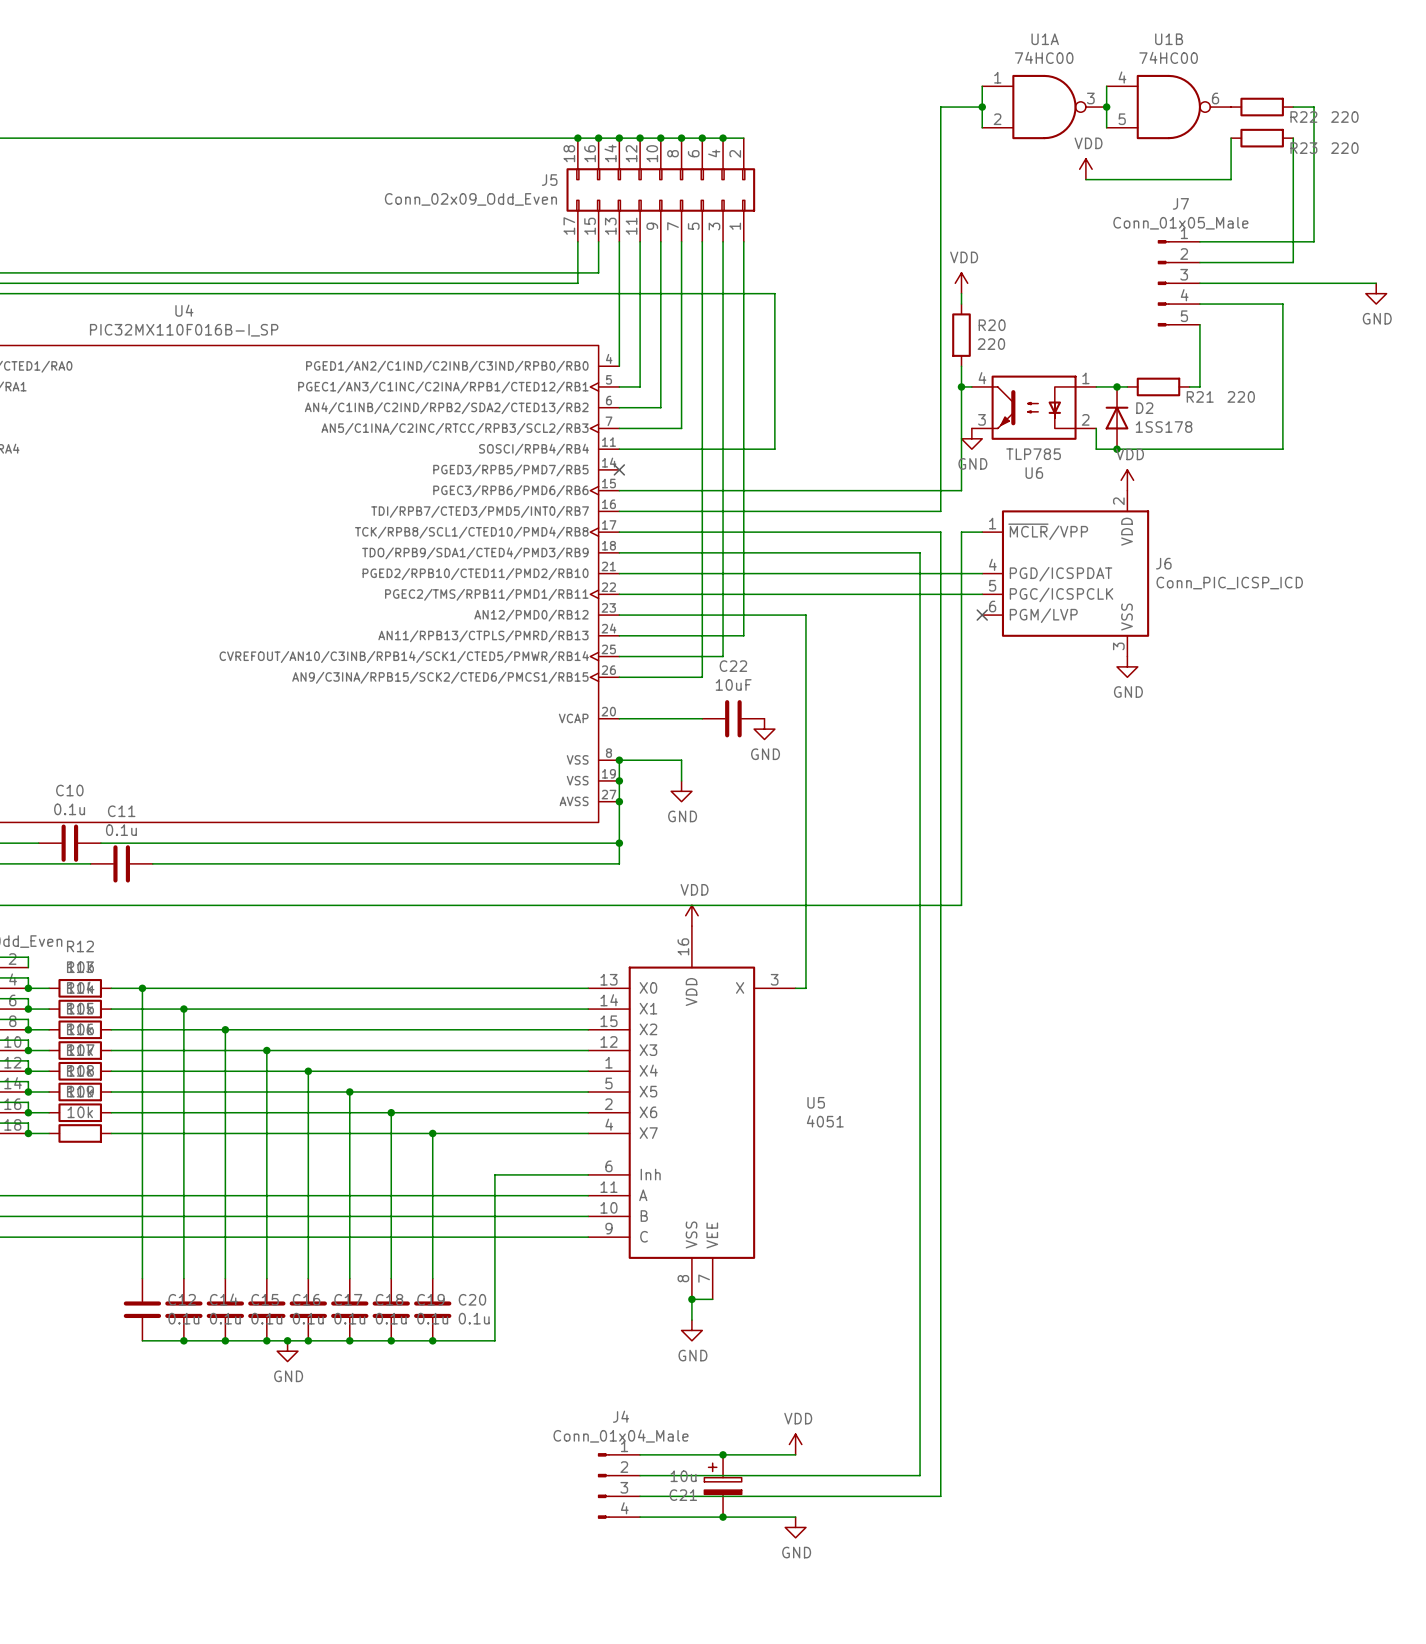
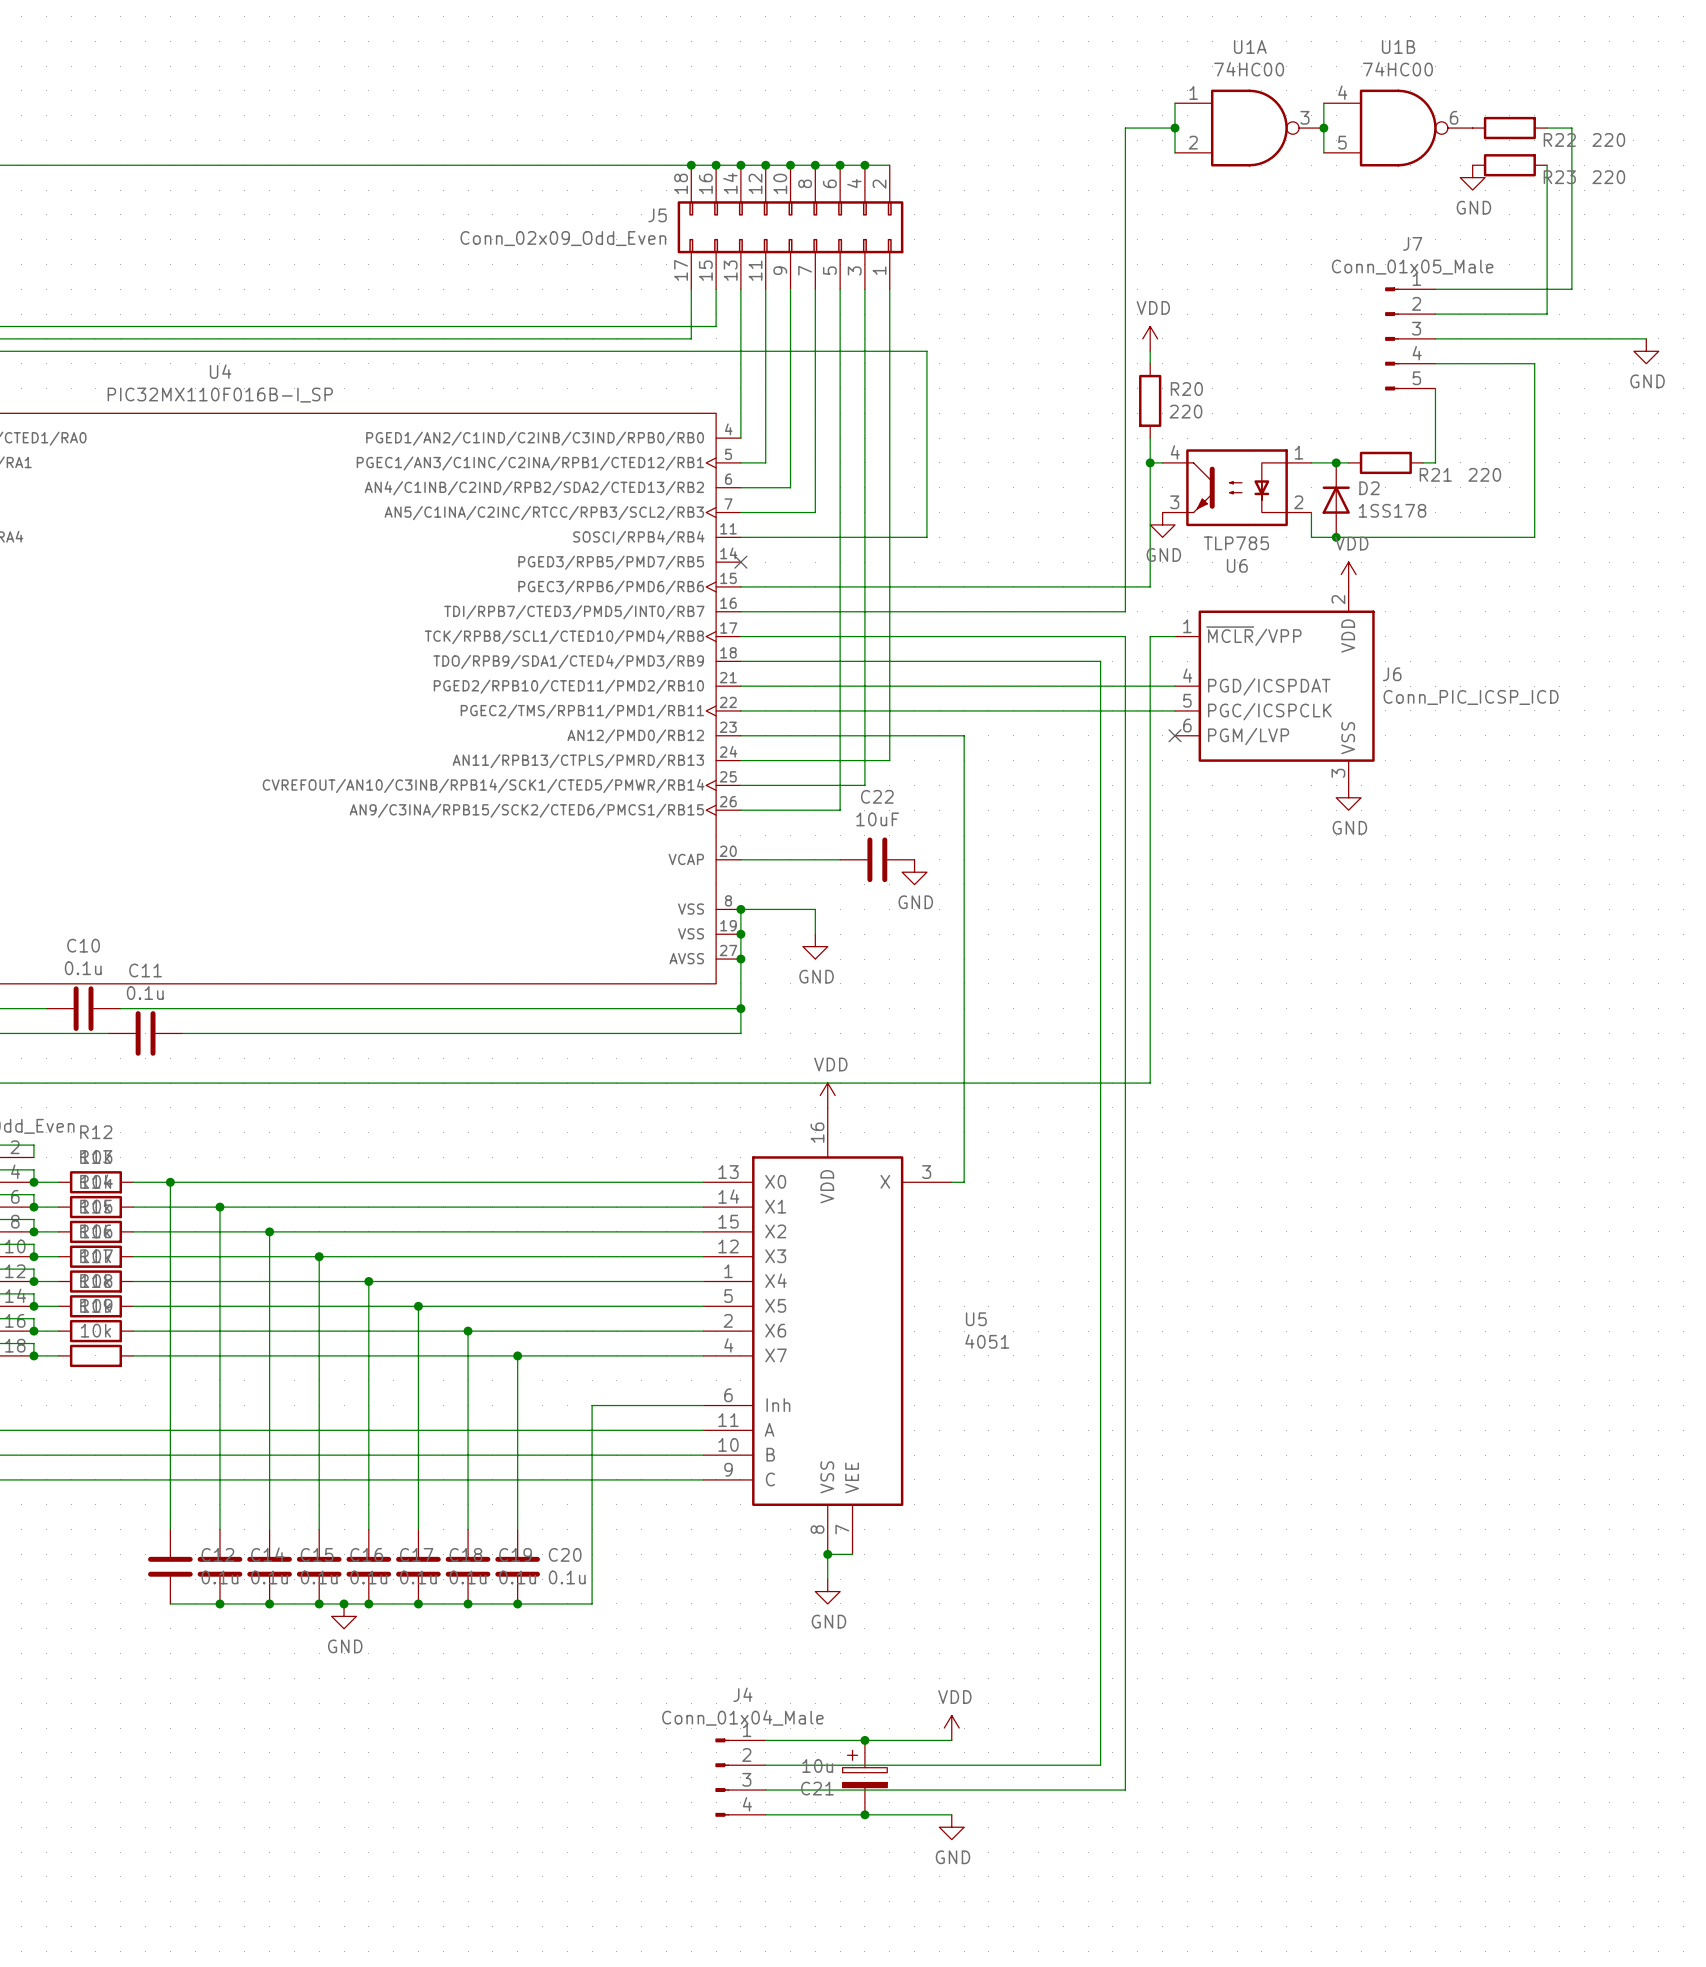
wire: (1231, 138) (1231, 179) (1085, 179) -> none
power symbol: none -> GND (1472, 177)
power symbol: VDD (1085, 169) -> none

